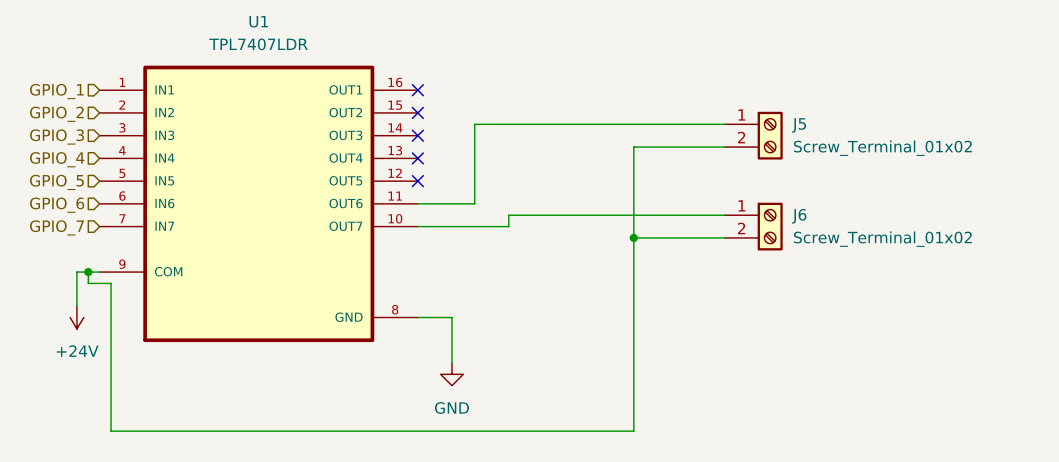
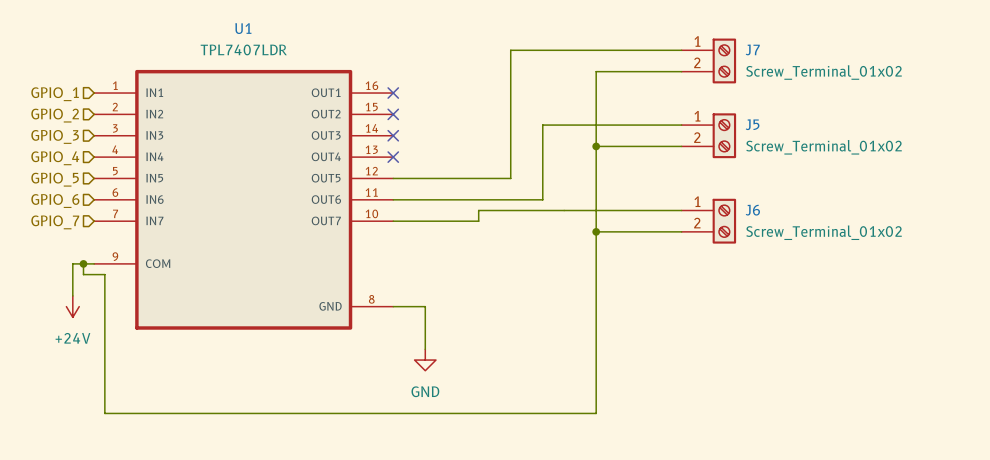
wire: none -> (681, 50) (510, 50) (510, 178) (393, 178)
J7: none -> Screw_Terminal_01x02 (708, 60)
wire: none -> (681, 71) (596, 71) (596, 146)
wire: (576, 124) (474, 124) (474, 203) -> (542, 125) (542, 199) (446, 199)
junction: none -> (596, 146)
no-connect mark: (417, 181) -> none

